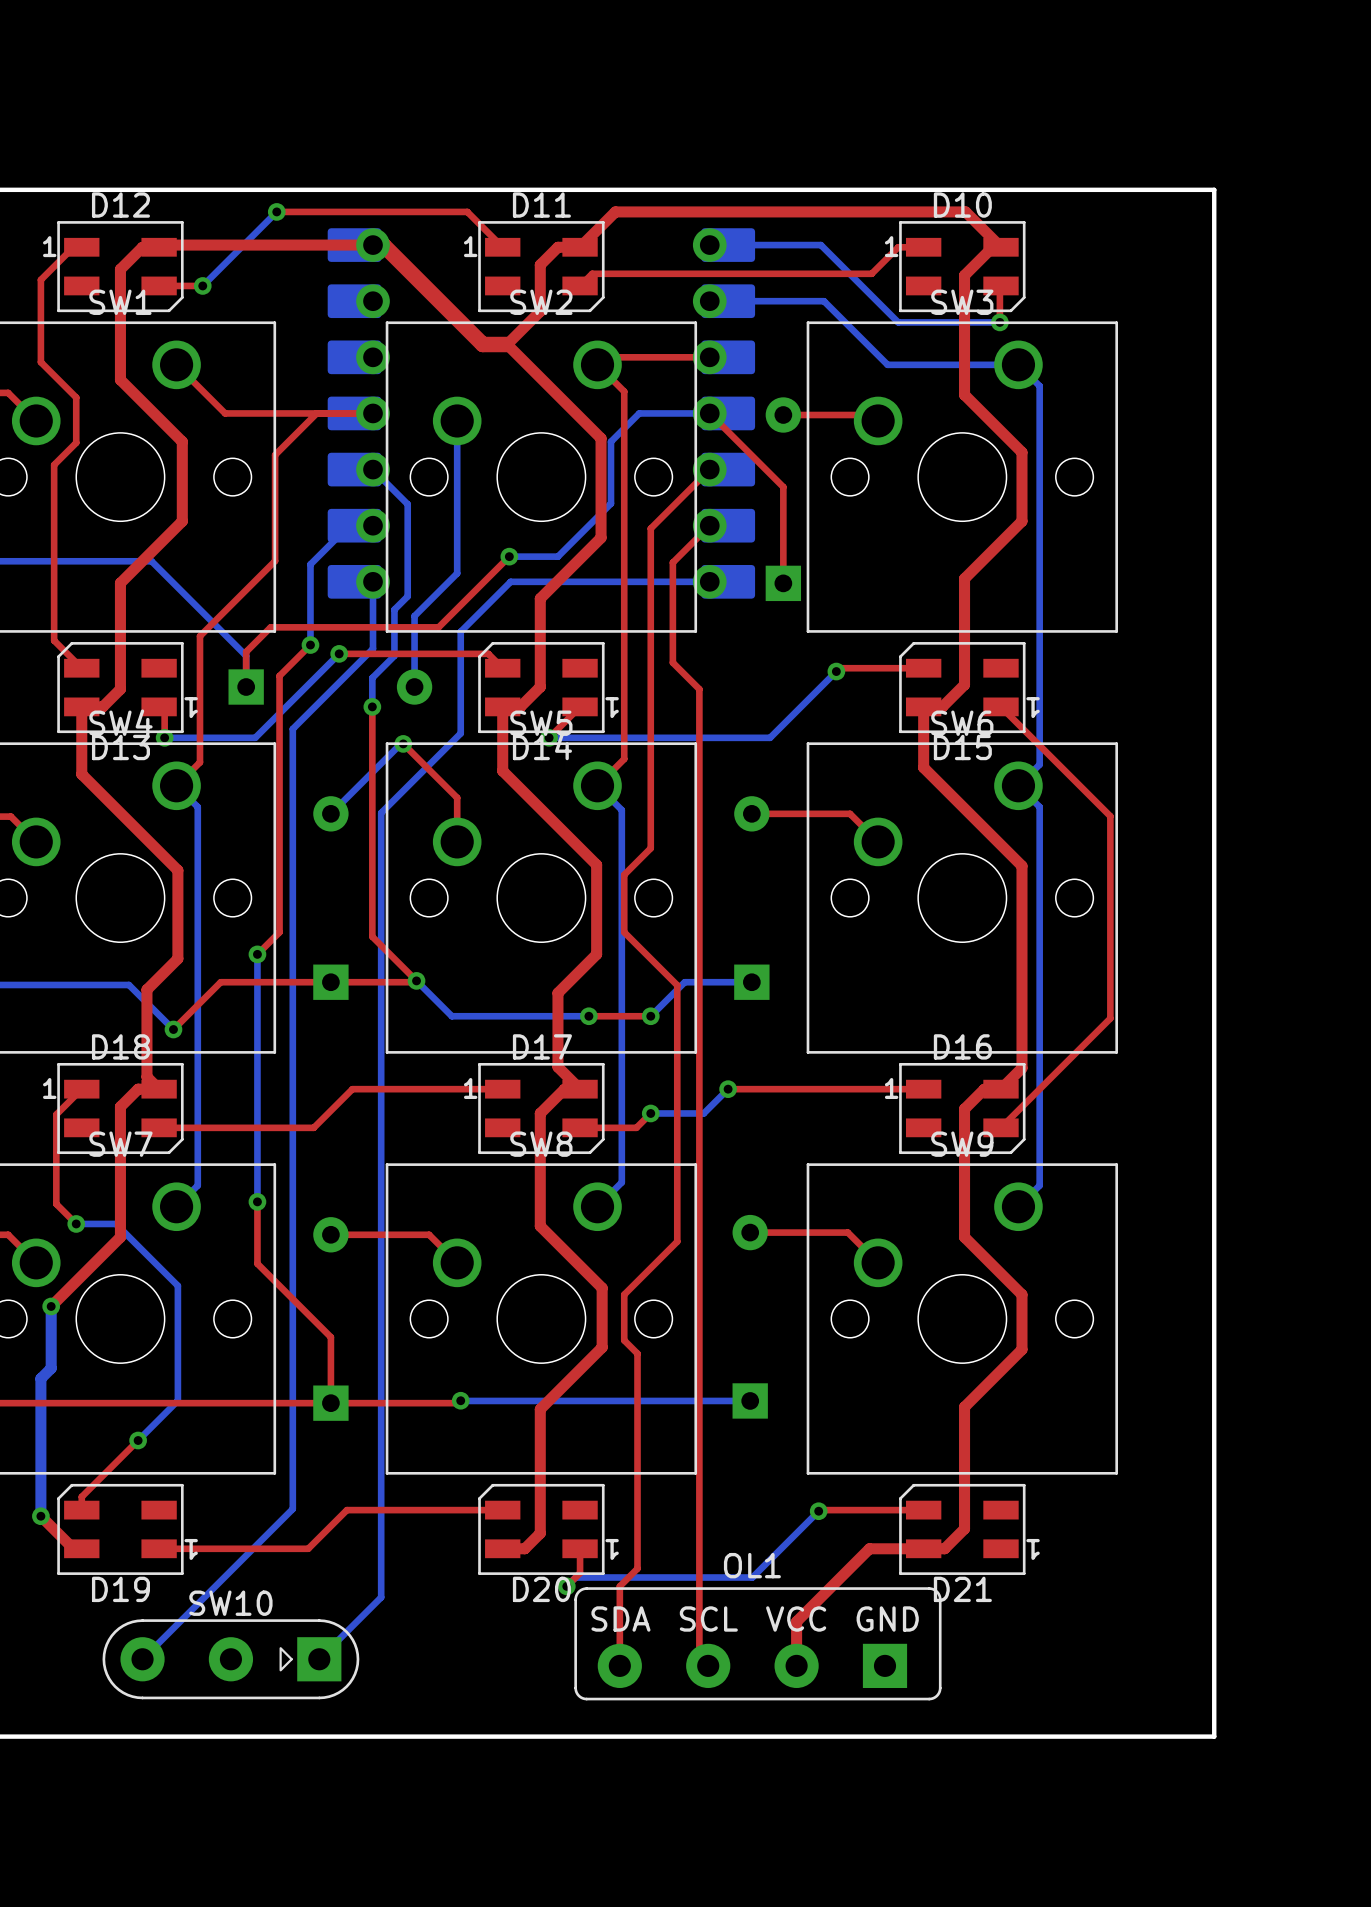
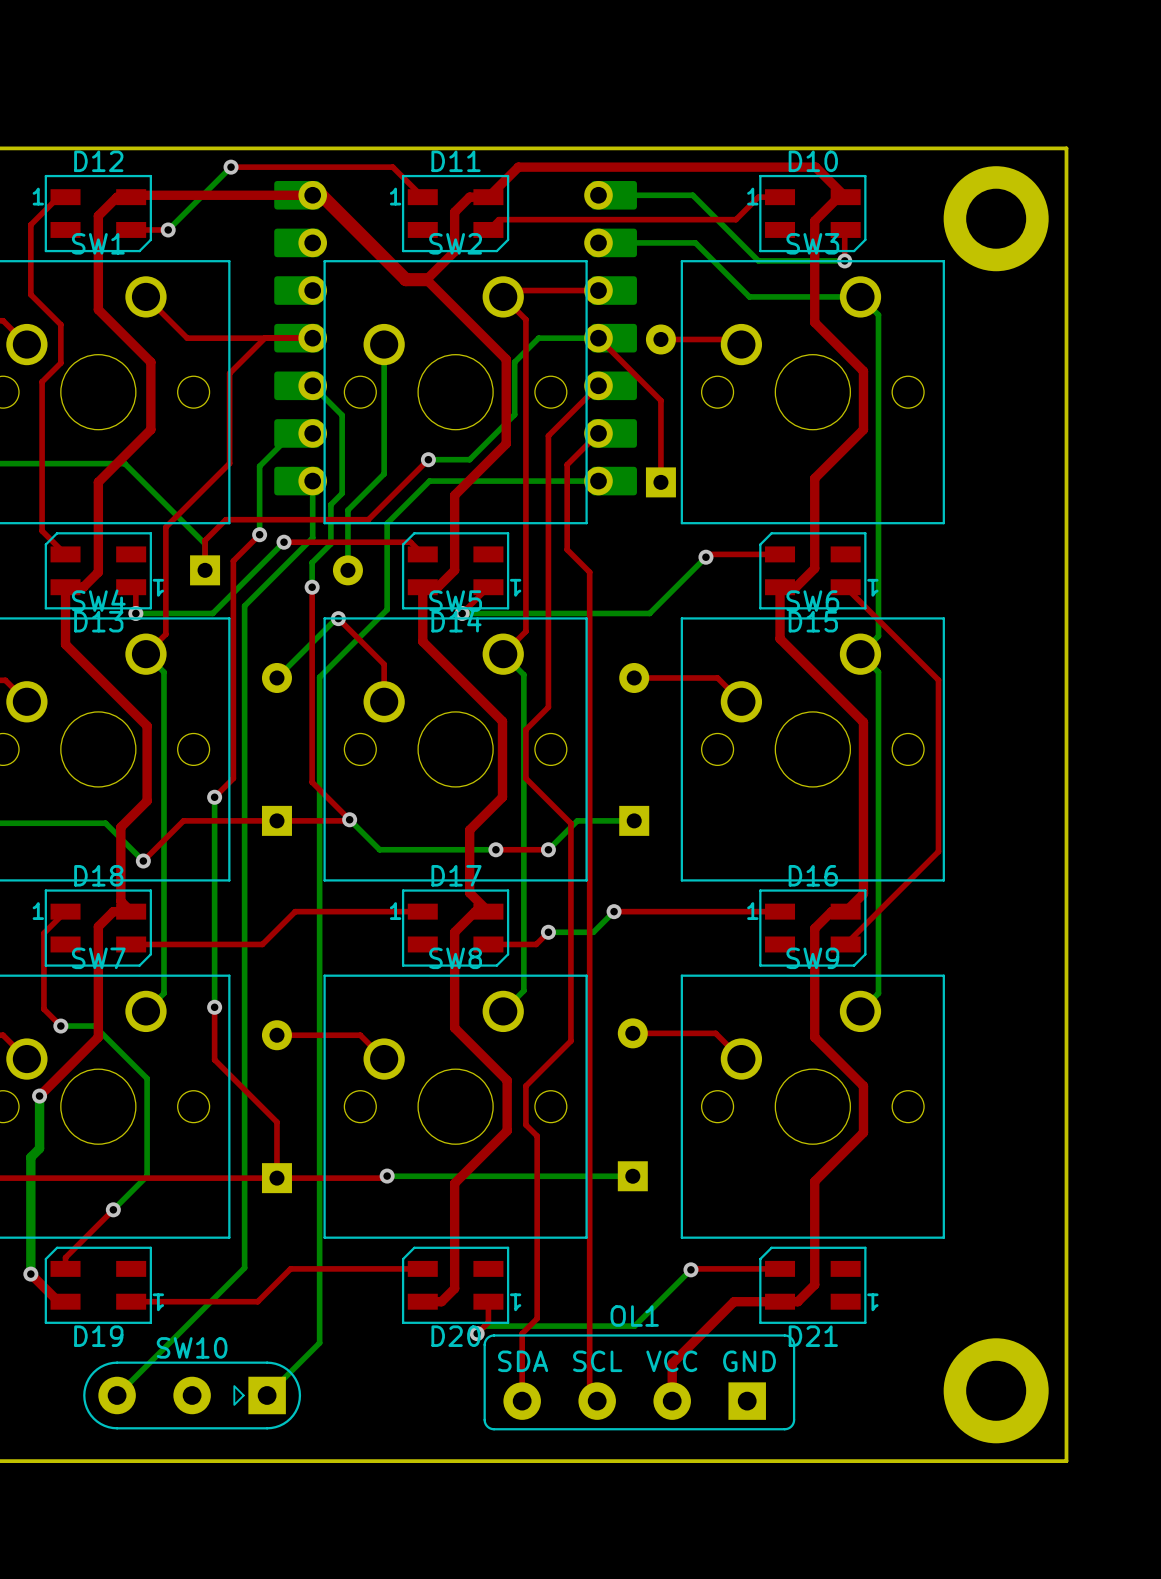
board edge: (1214, 189) (1214, 1736) -> (1026, 148) (1066, 148) (1066, 1461) (1026, 1461)
part: none -> (996, 218)
part: none -> (996, 1390)

